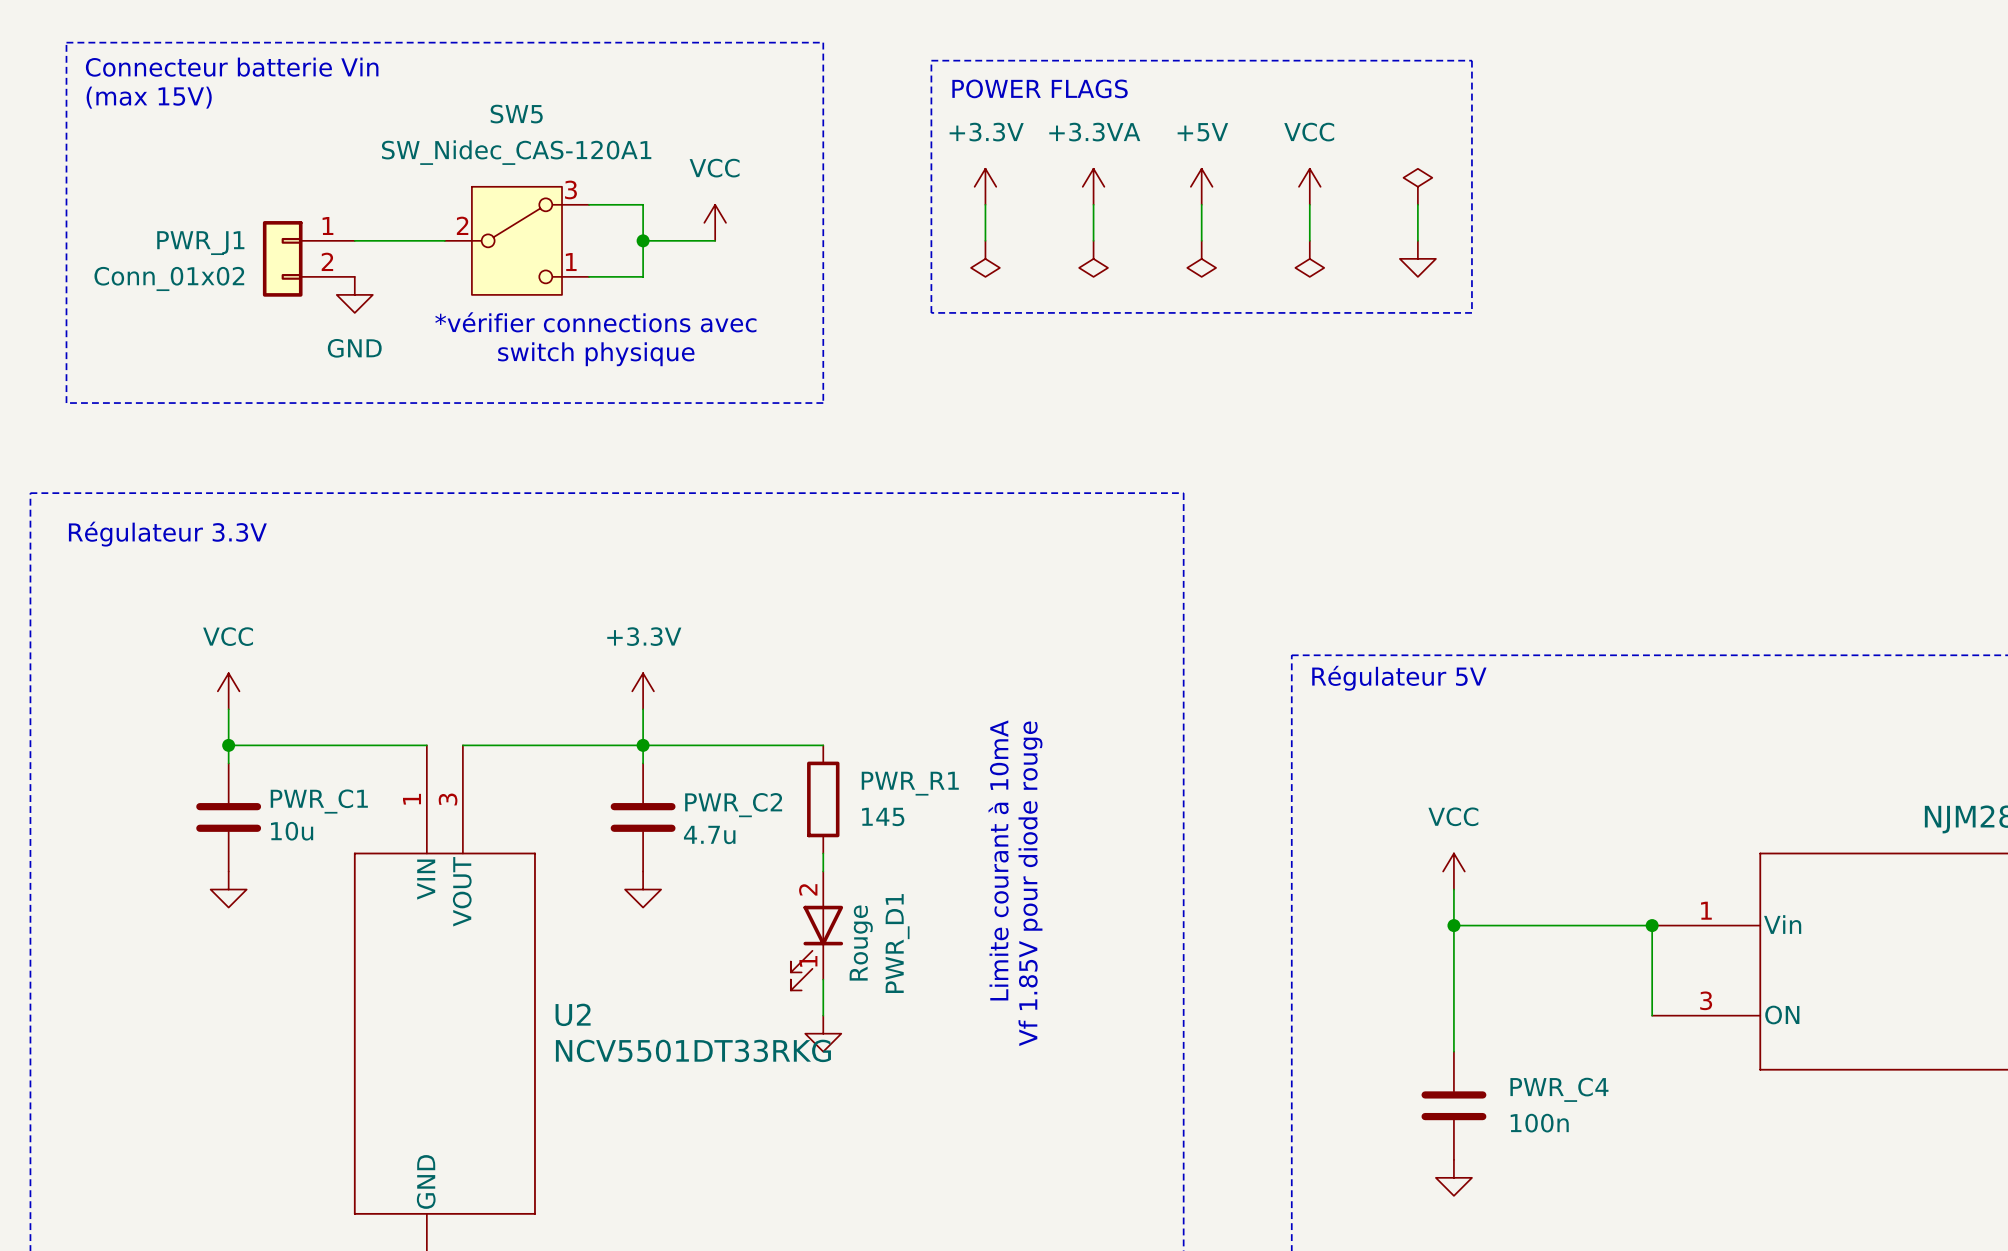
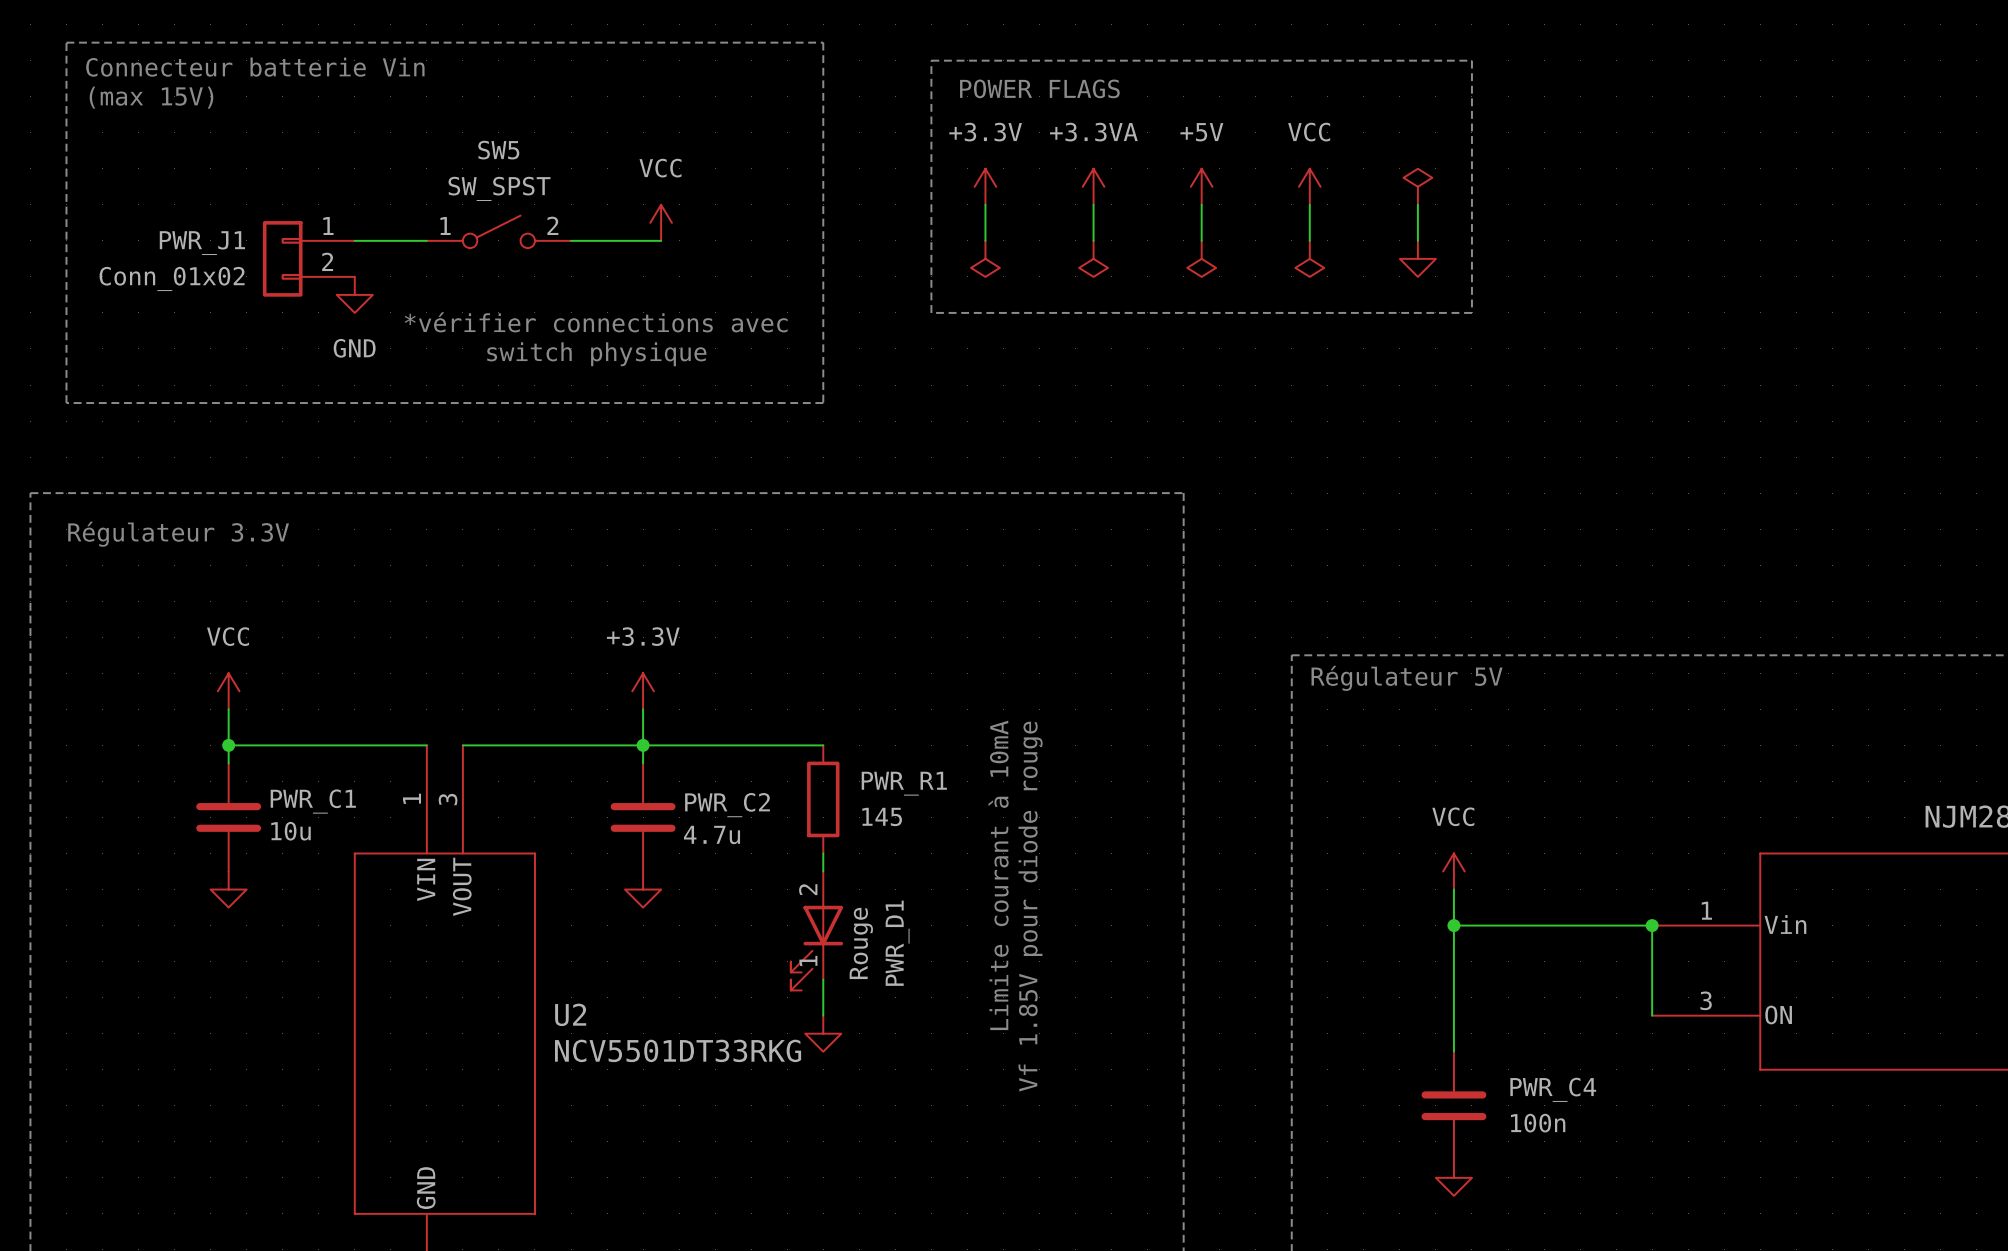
SW5 name position: SW5 (516, 114) -> SW5 (498, 150)
SW5 value: SW_Nidec_CAS-120A1 (516, 152) -> SW_SPST (499, 188)
SW5 symbol: [444, 186, 590, 295] -> [426, 215, 572, 249]
wire: (589, 204) (643, 204) (643, 276) (589, 276) -> none
power symbol position: VCC (715, 222) -> VCC (661, 222)
wire: none -> (571, 240) (643, 240)
junction: (643, 240) -> none
wire: (661, 240) (715, 240) -> none

